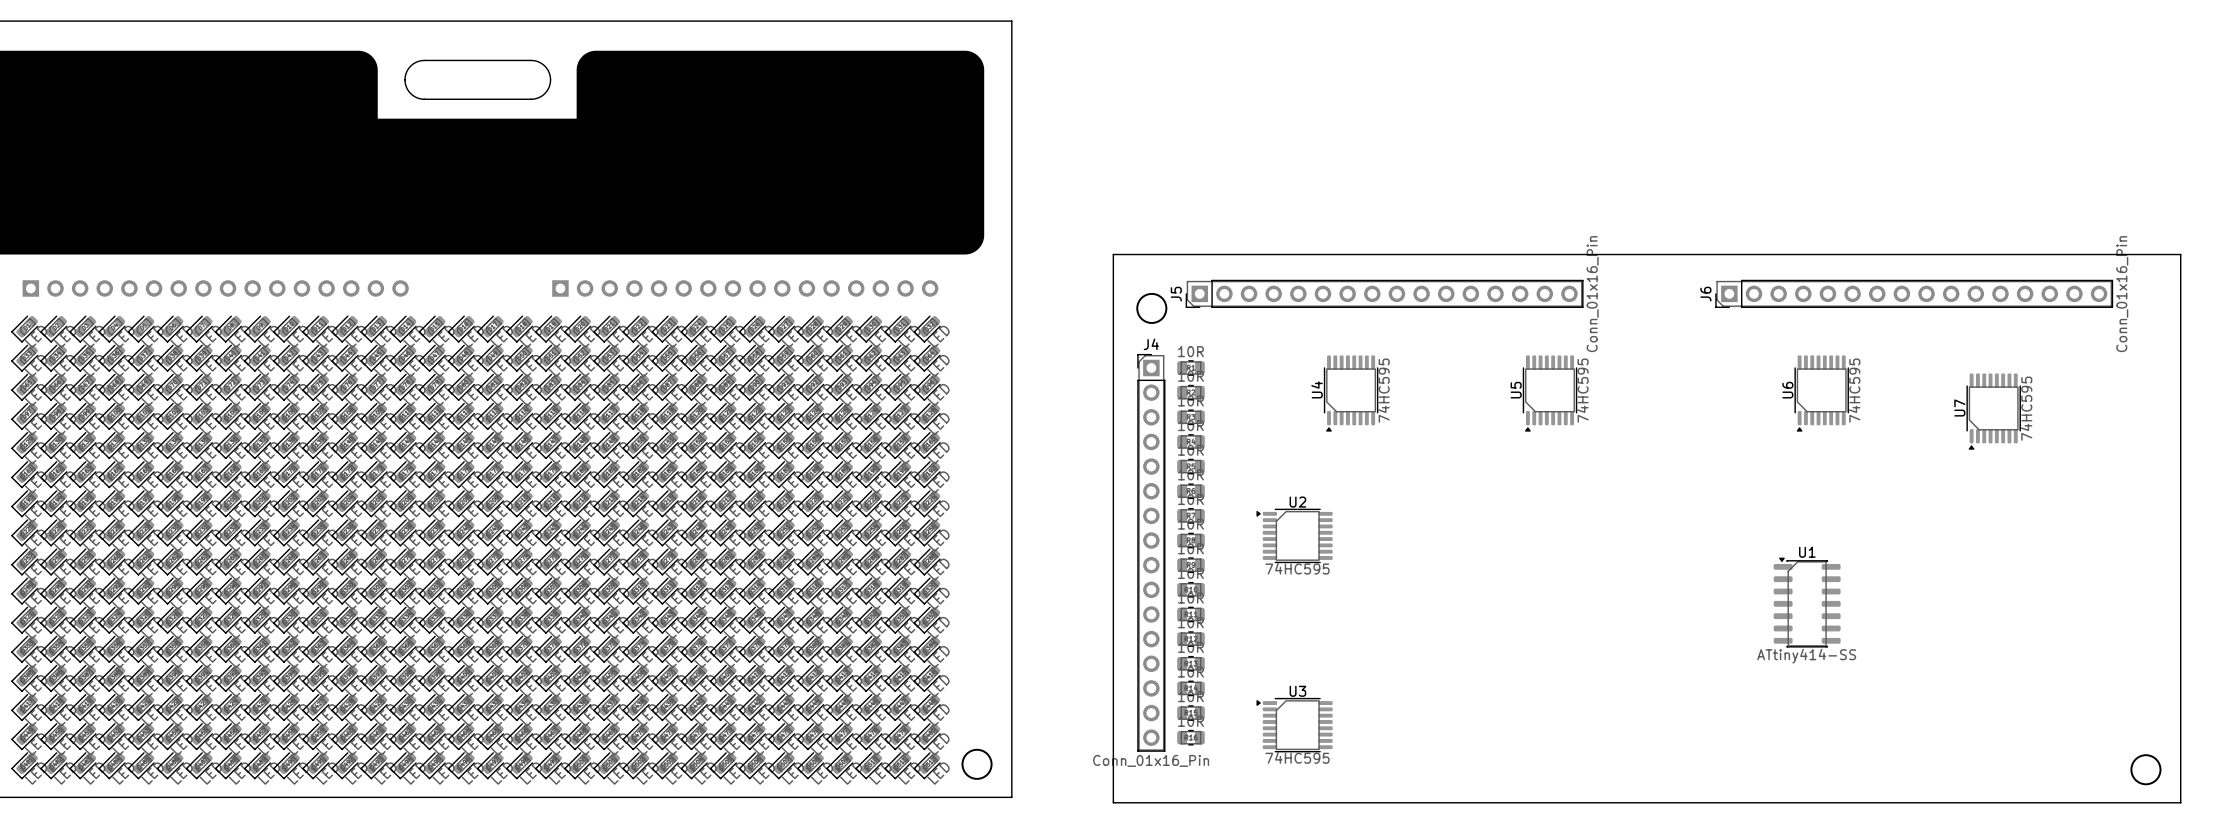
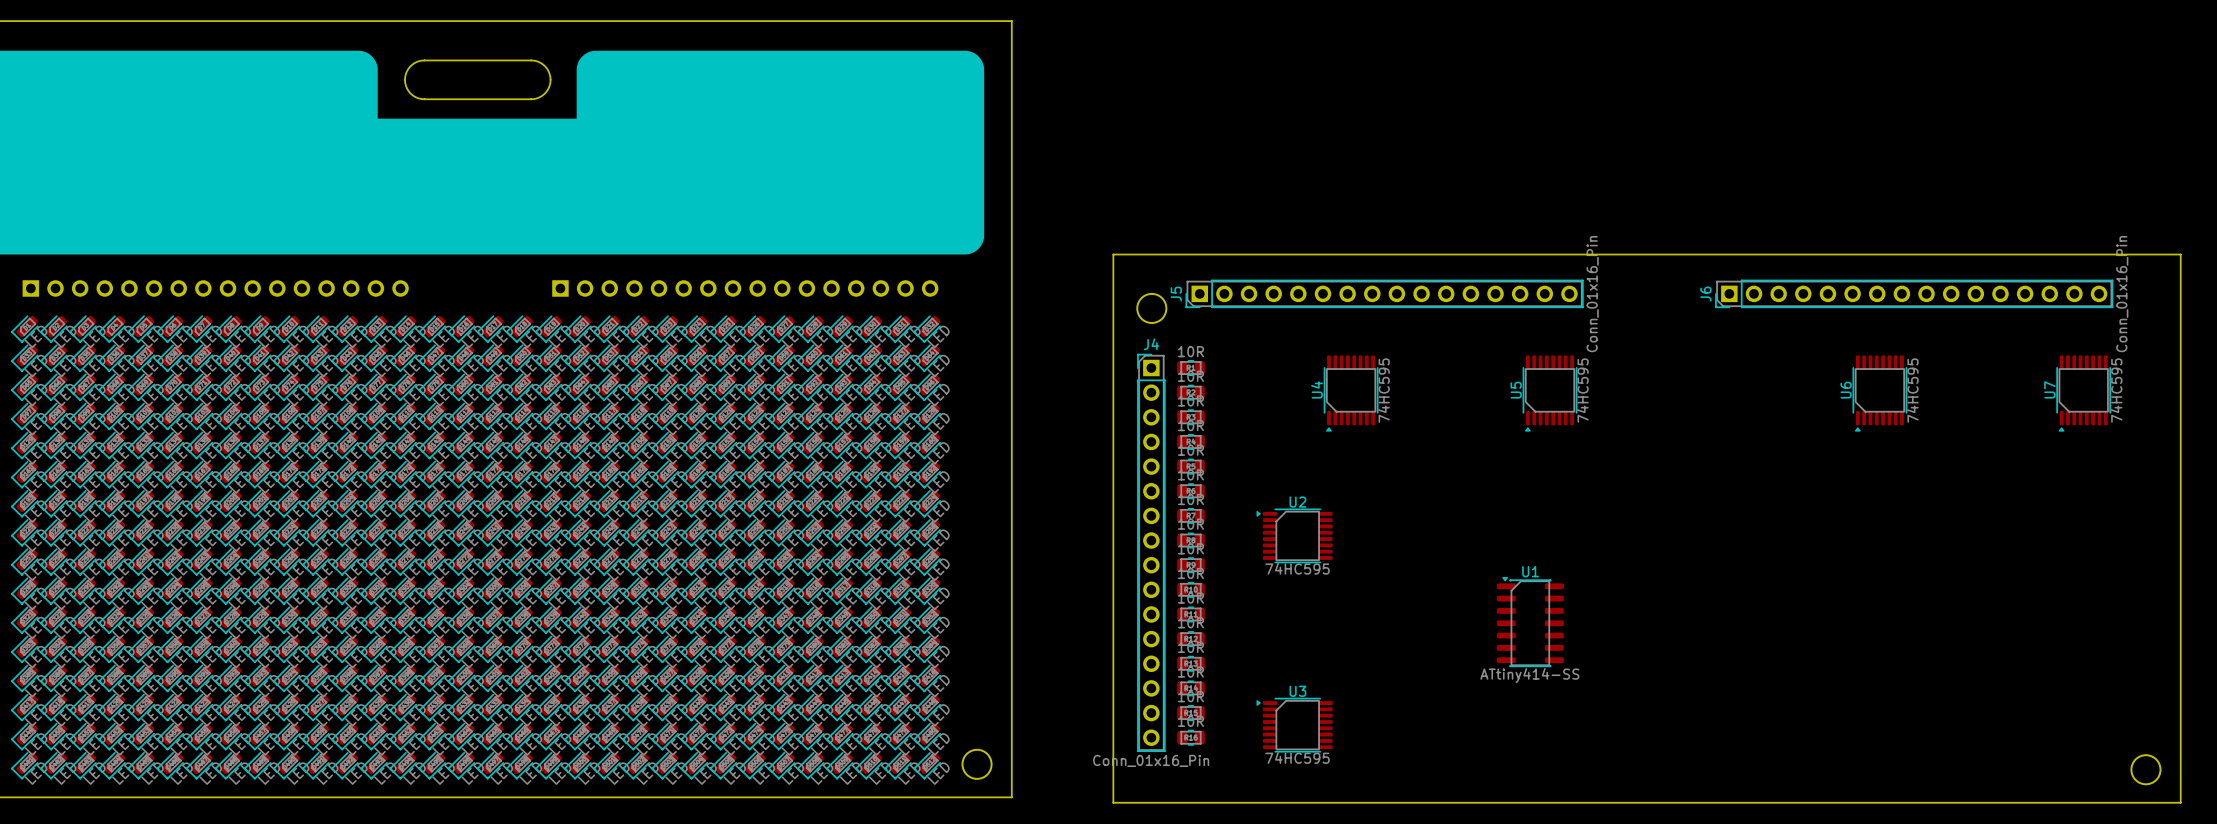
U6 position: (1821, 393) -> (1879, 393)
U7 position: (1993, 411) -> (2083, 393)
U1 position: (1807, 602) -> (1530, 621)

